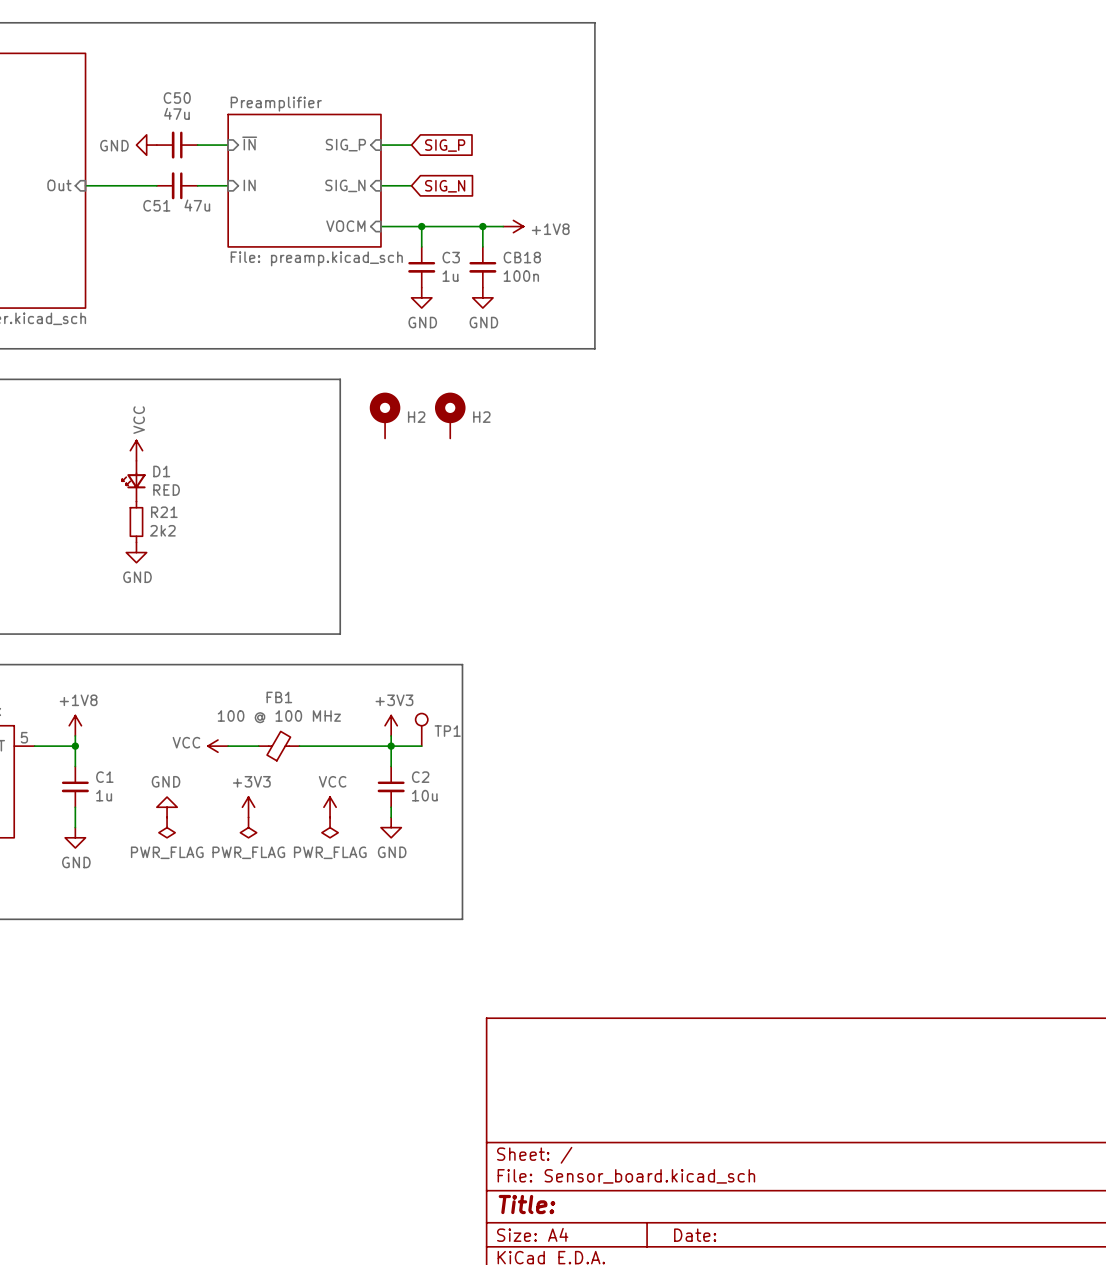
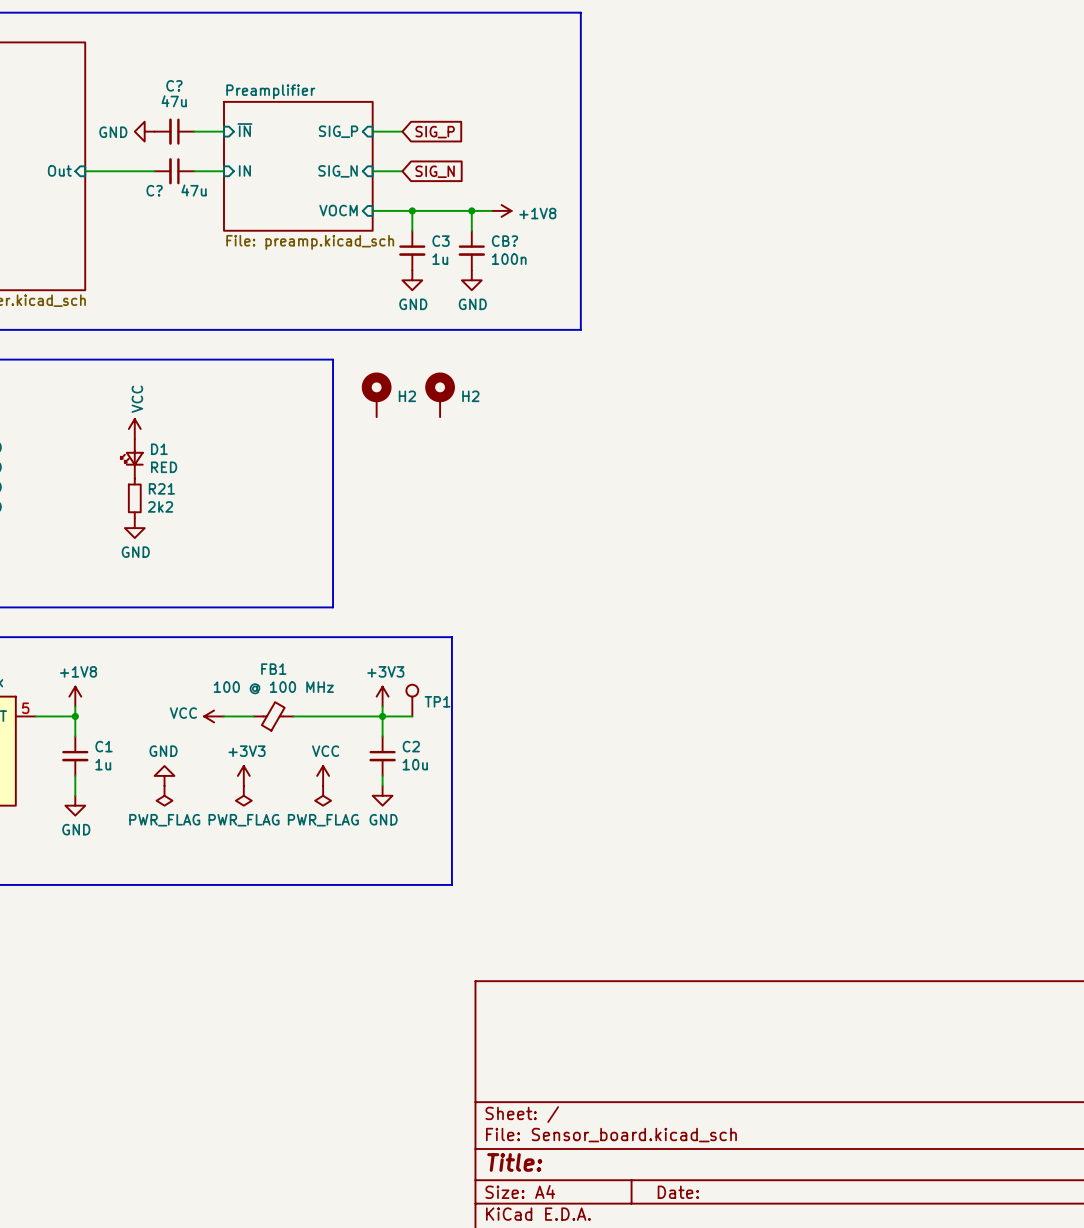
C50 name: C50 (177, 98) -> C? (174, 85)
C51 name: C51 (156, 205) -> C? (154, 190)
CB18 name: CB18 (522, 257) -> CB? (504, 241)

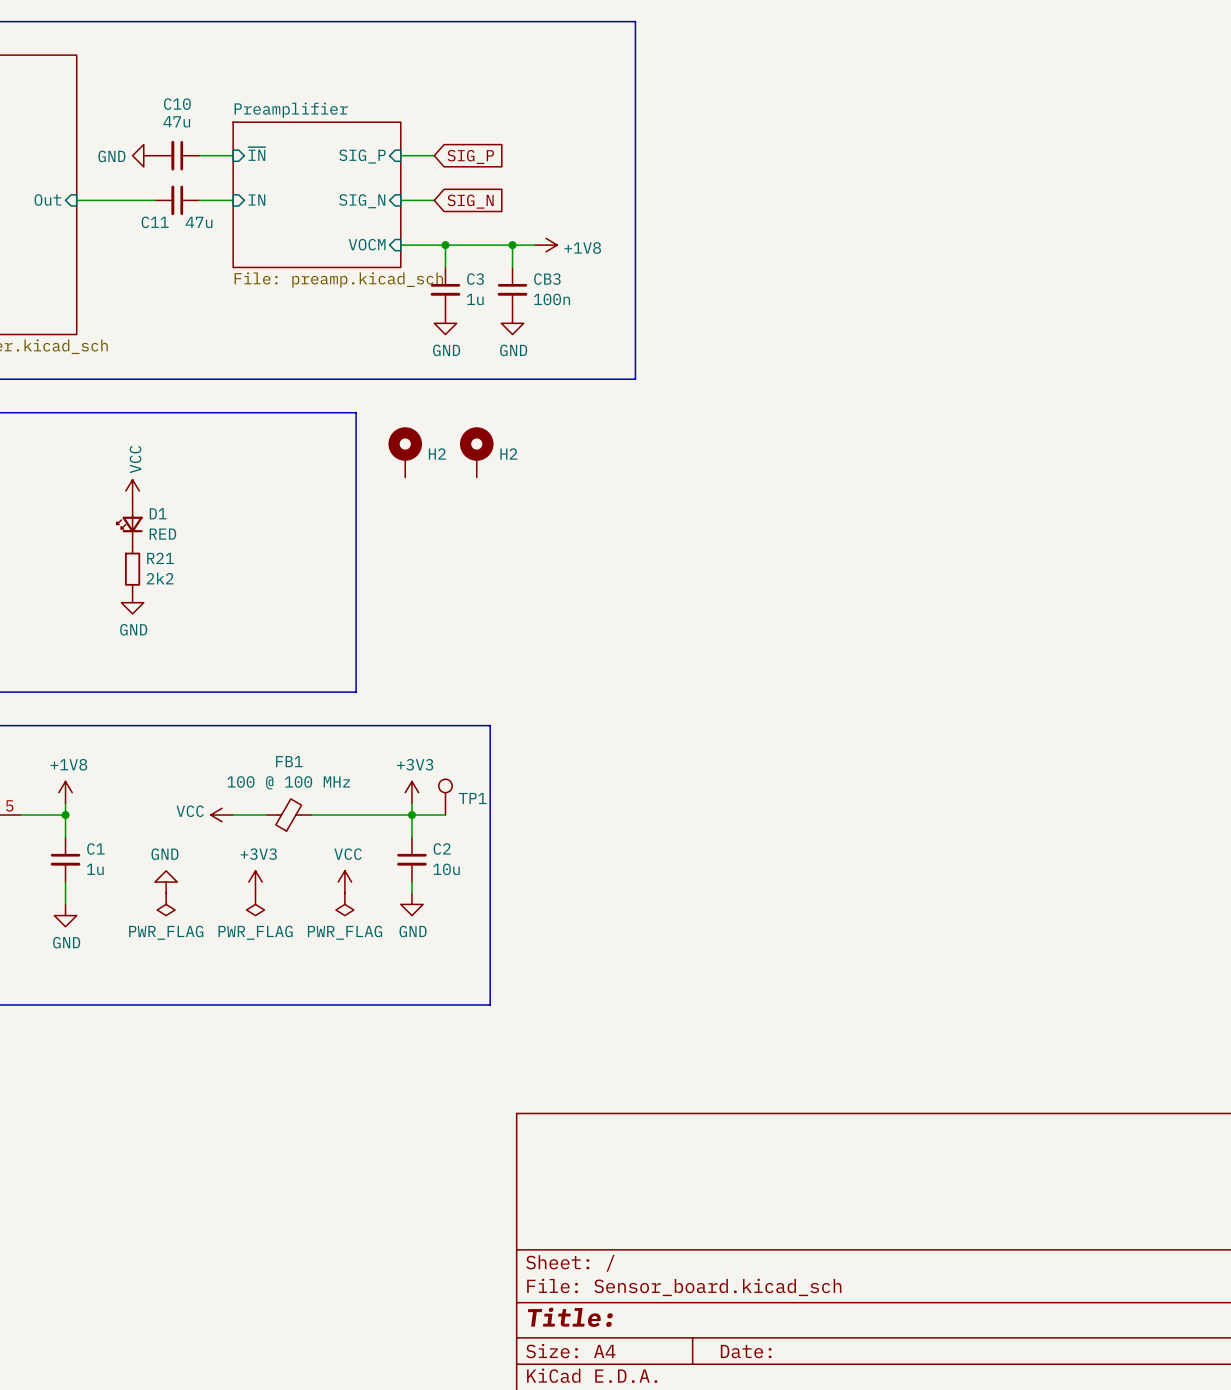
C? name: C? (174, 85) -> C10 (177, 104)
C? name: C? (154, 190) -> C11 (155, 222)
CB? name: CB? (504, 241) -> CB3 (547, 279)

